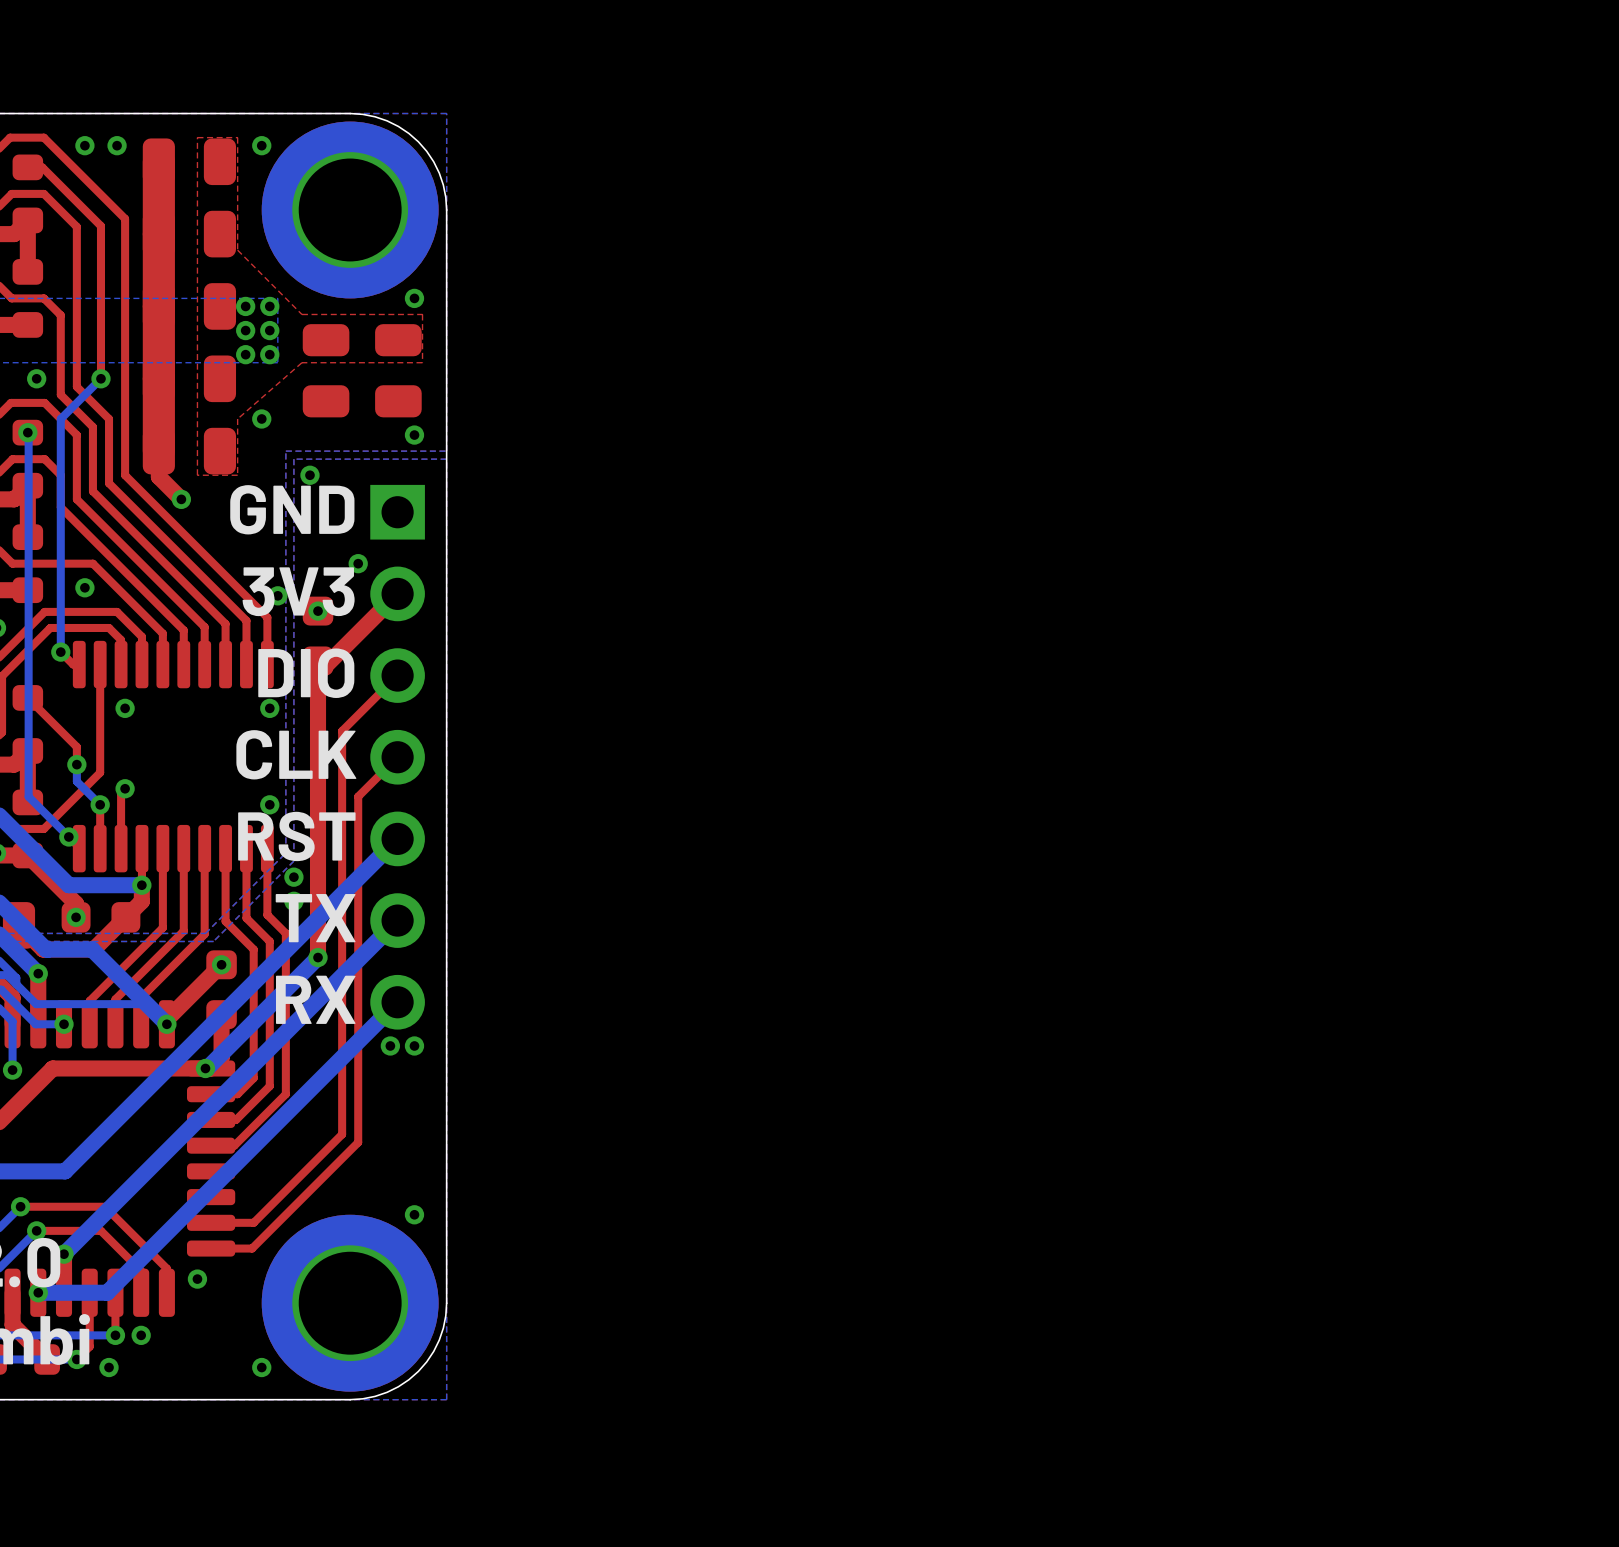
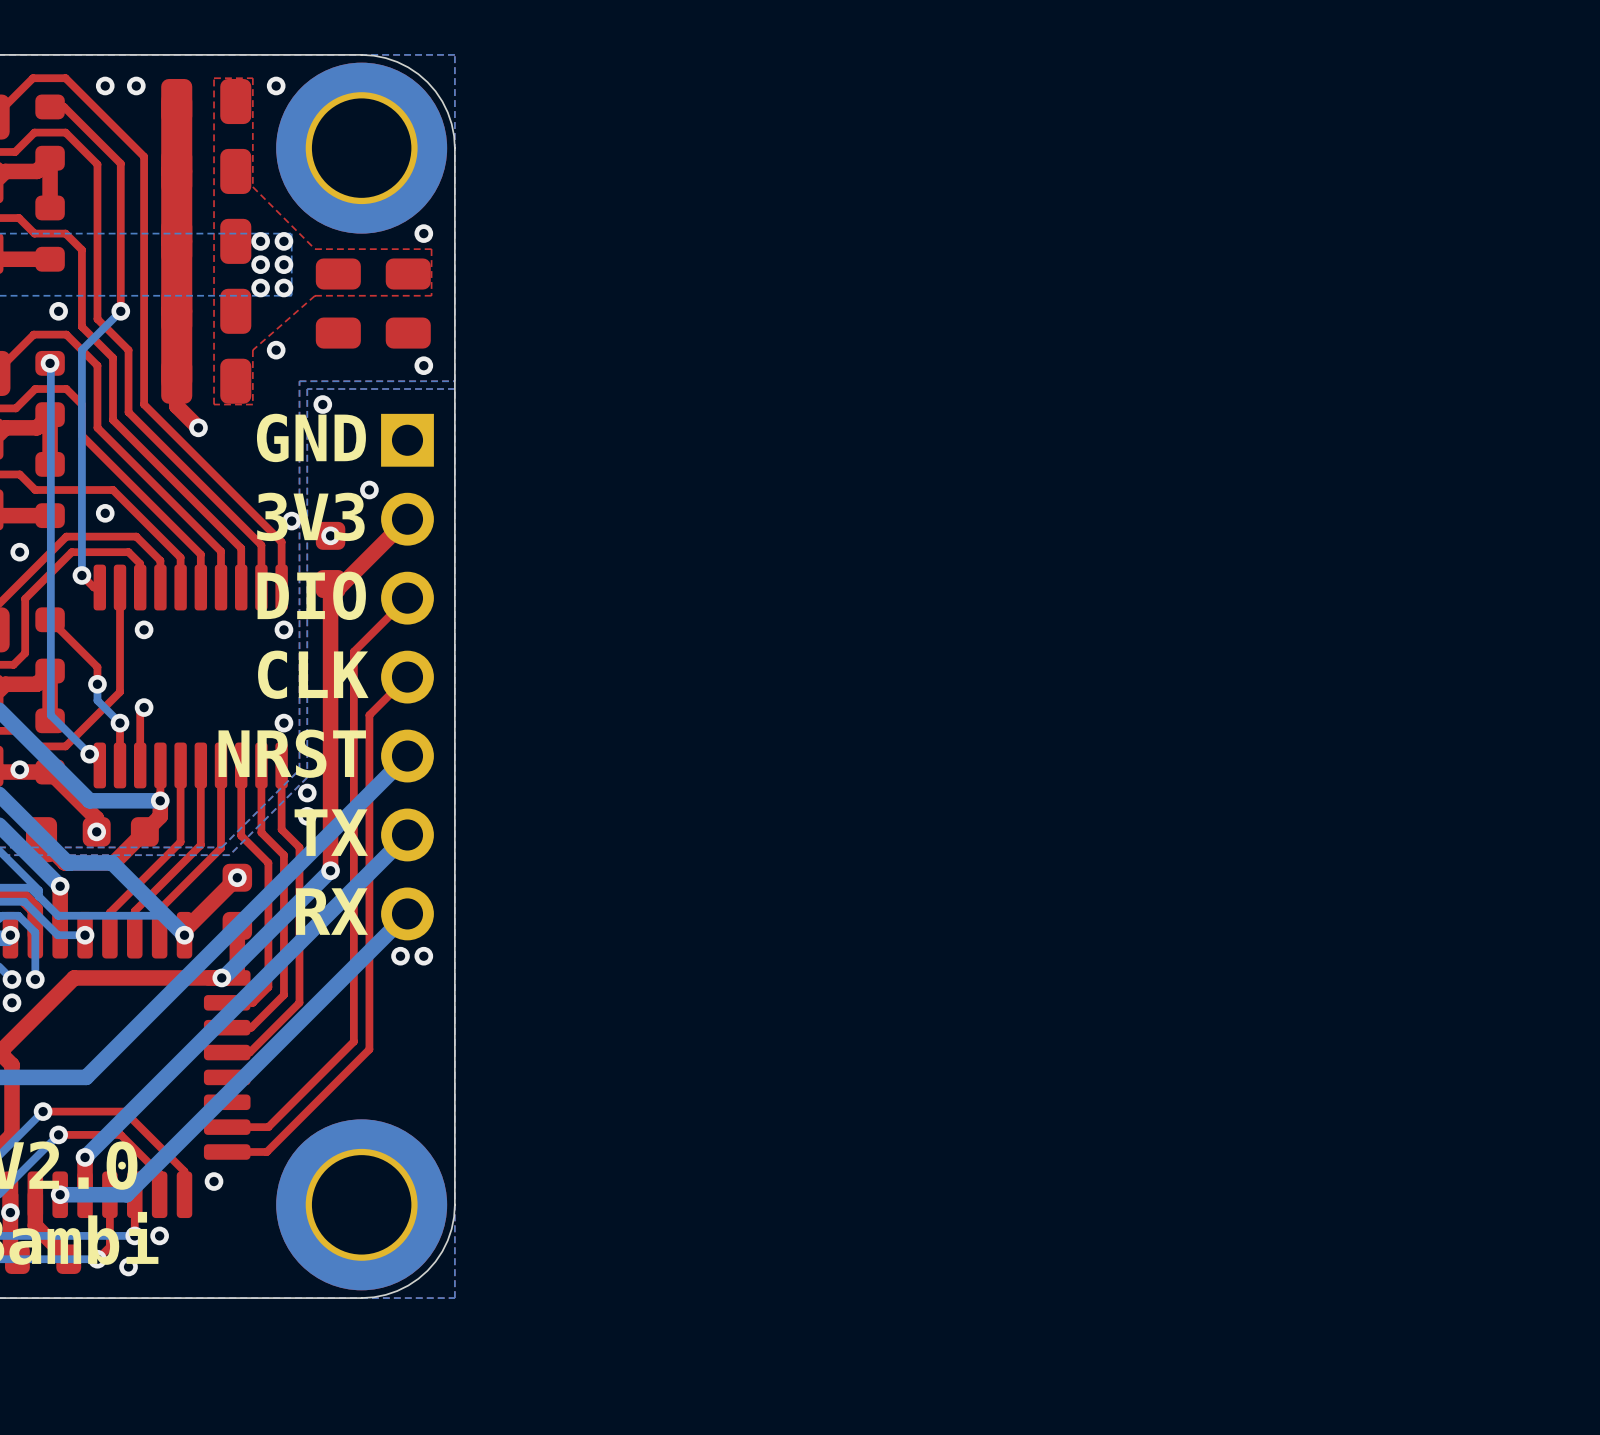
text: RST (296, 836) -> NRST (292, 753)
via: (414, 1214) -> none
via: (261, 1367) -> none

